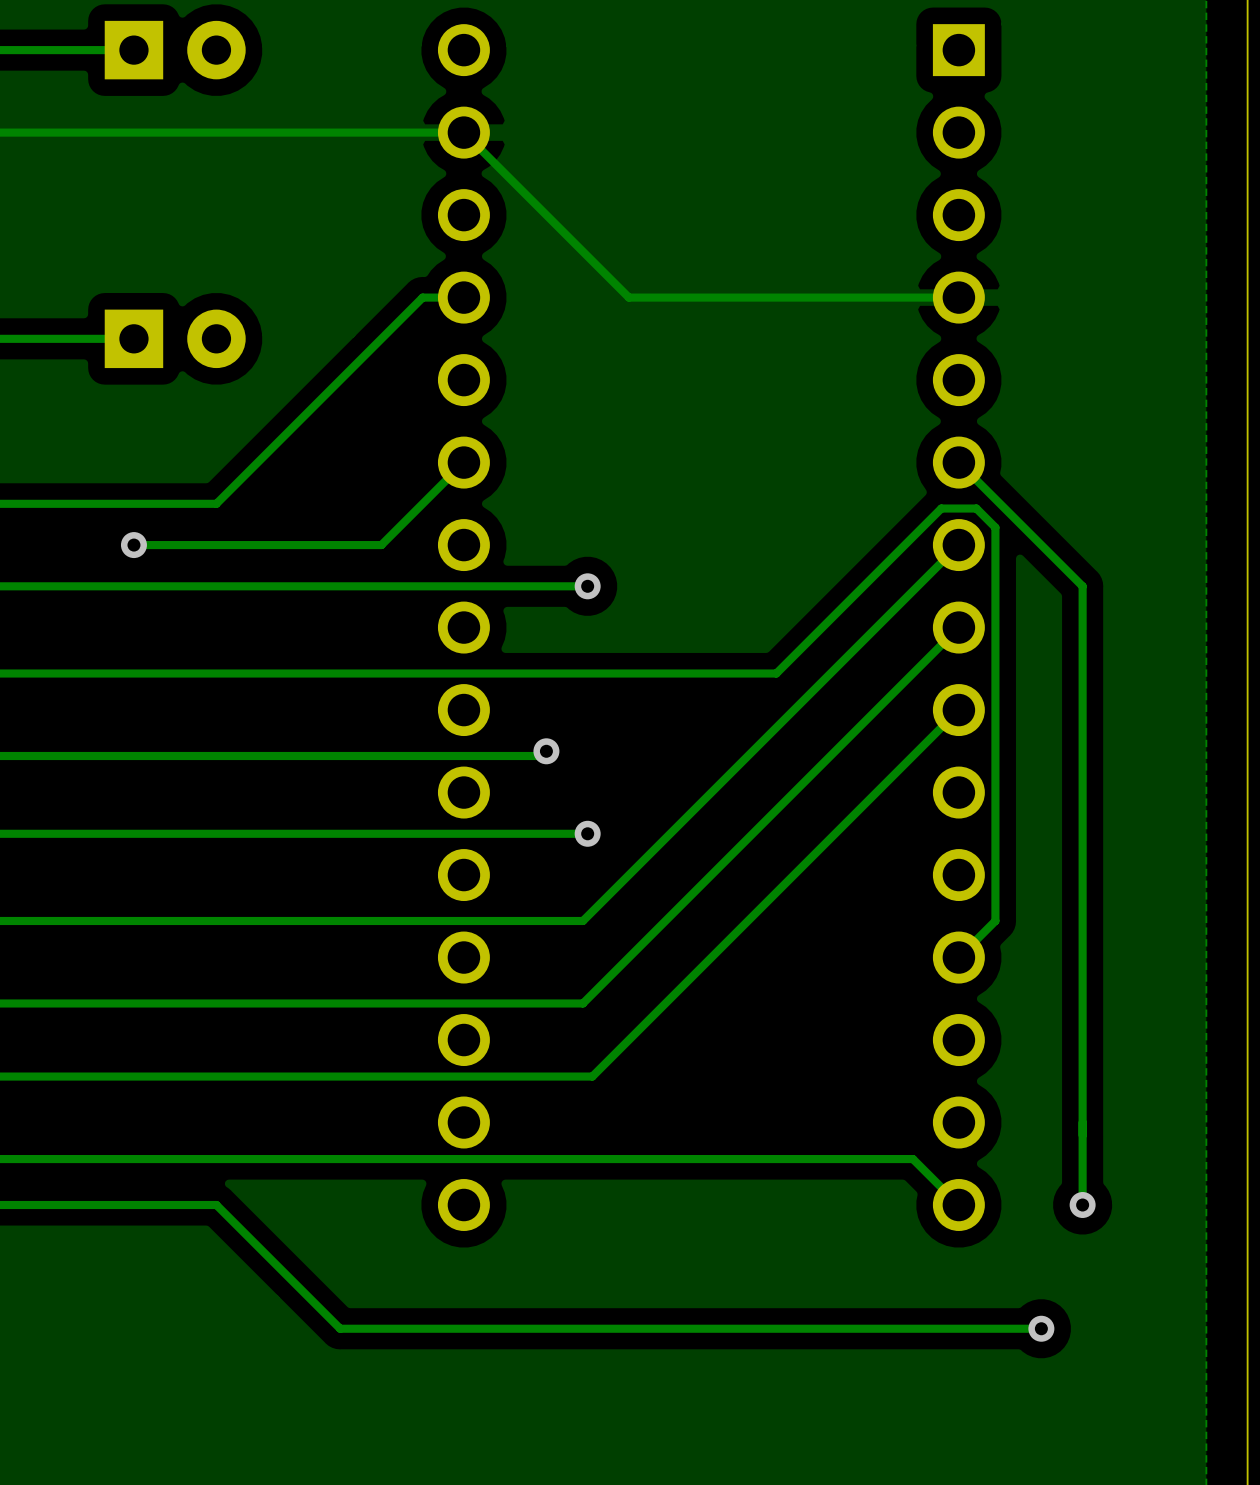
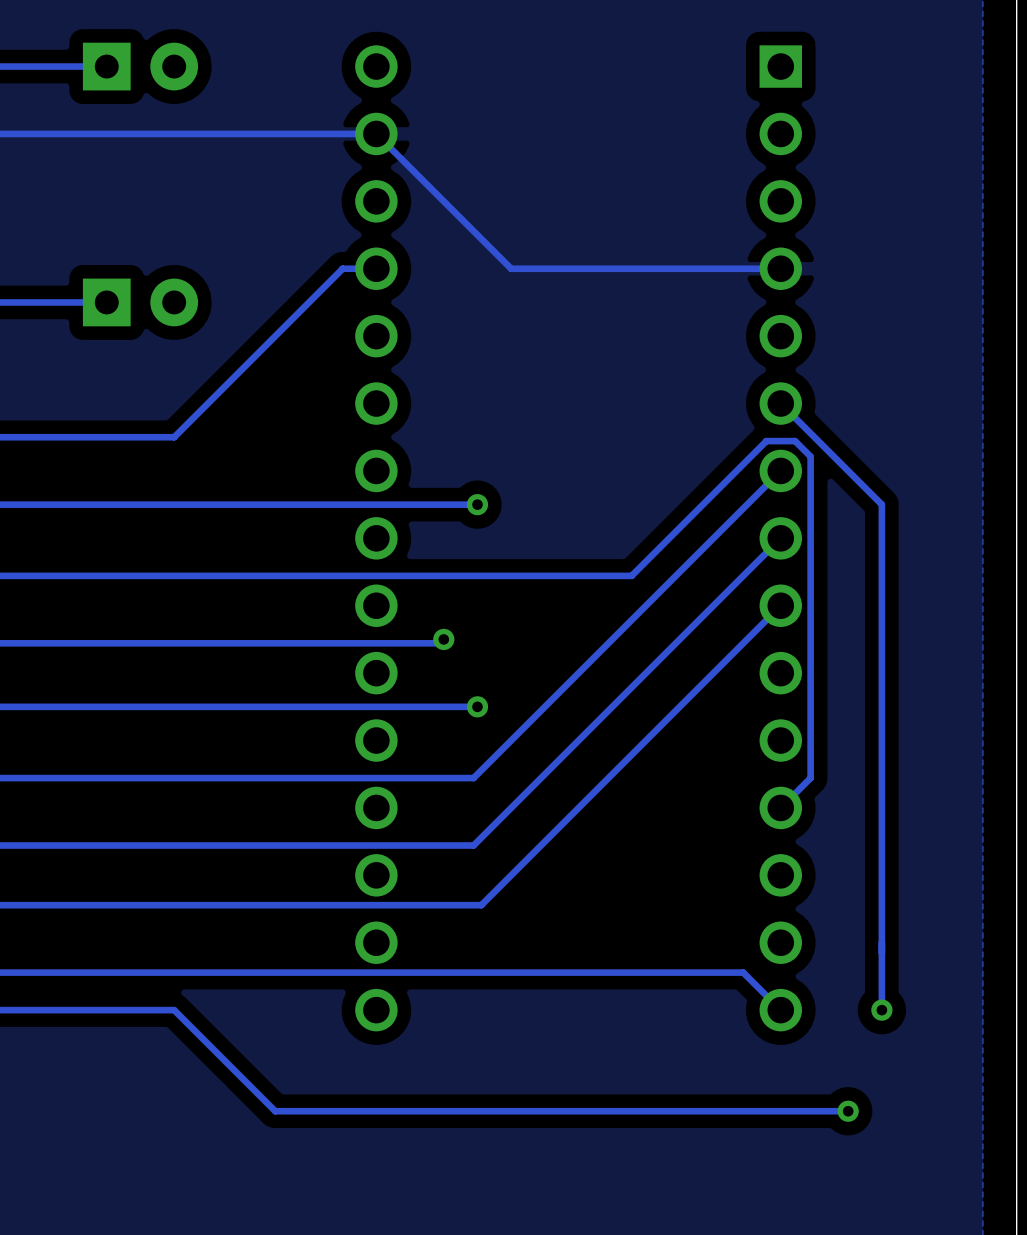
track: (463, 462) (381, 545) (133, 545) -> none
via: (133, 545) -> none

